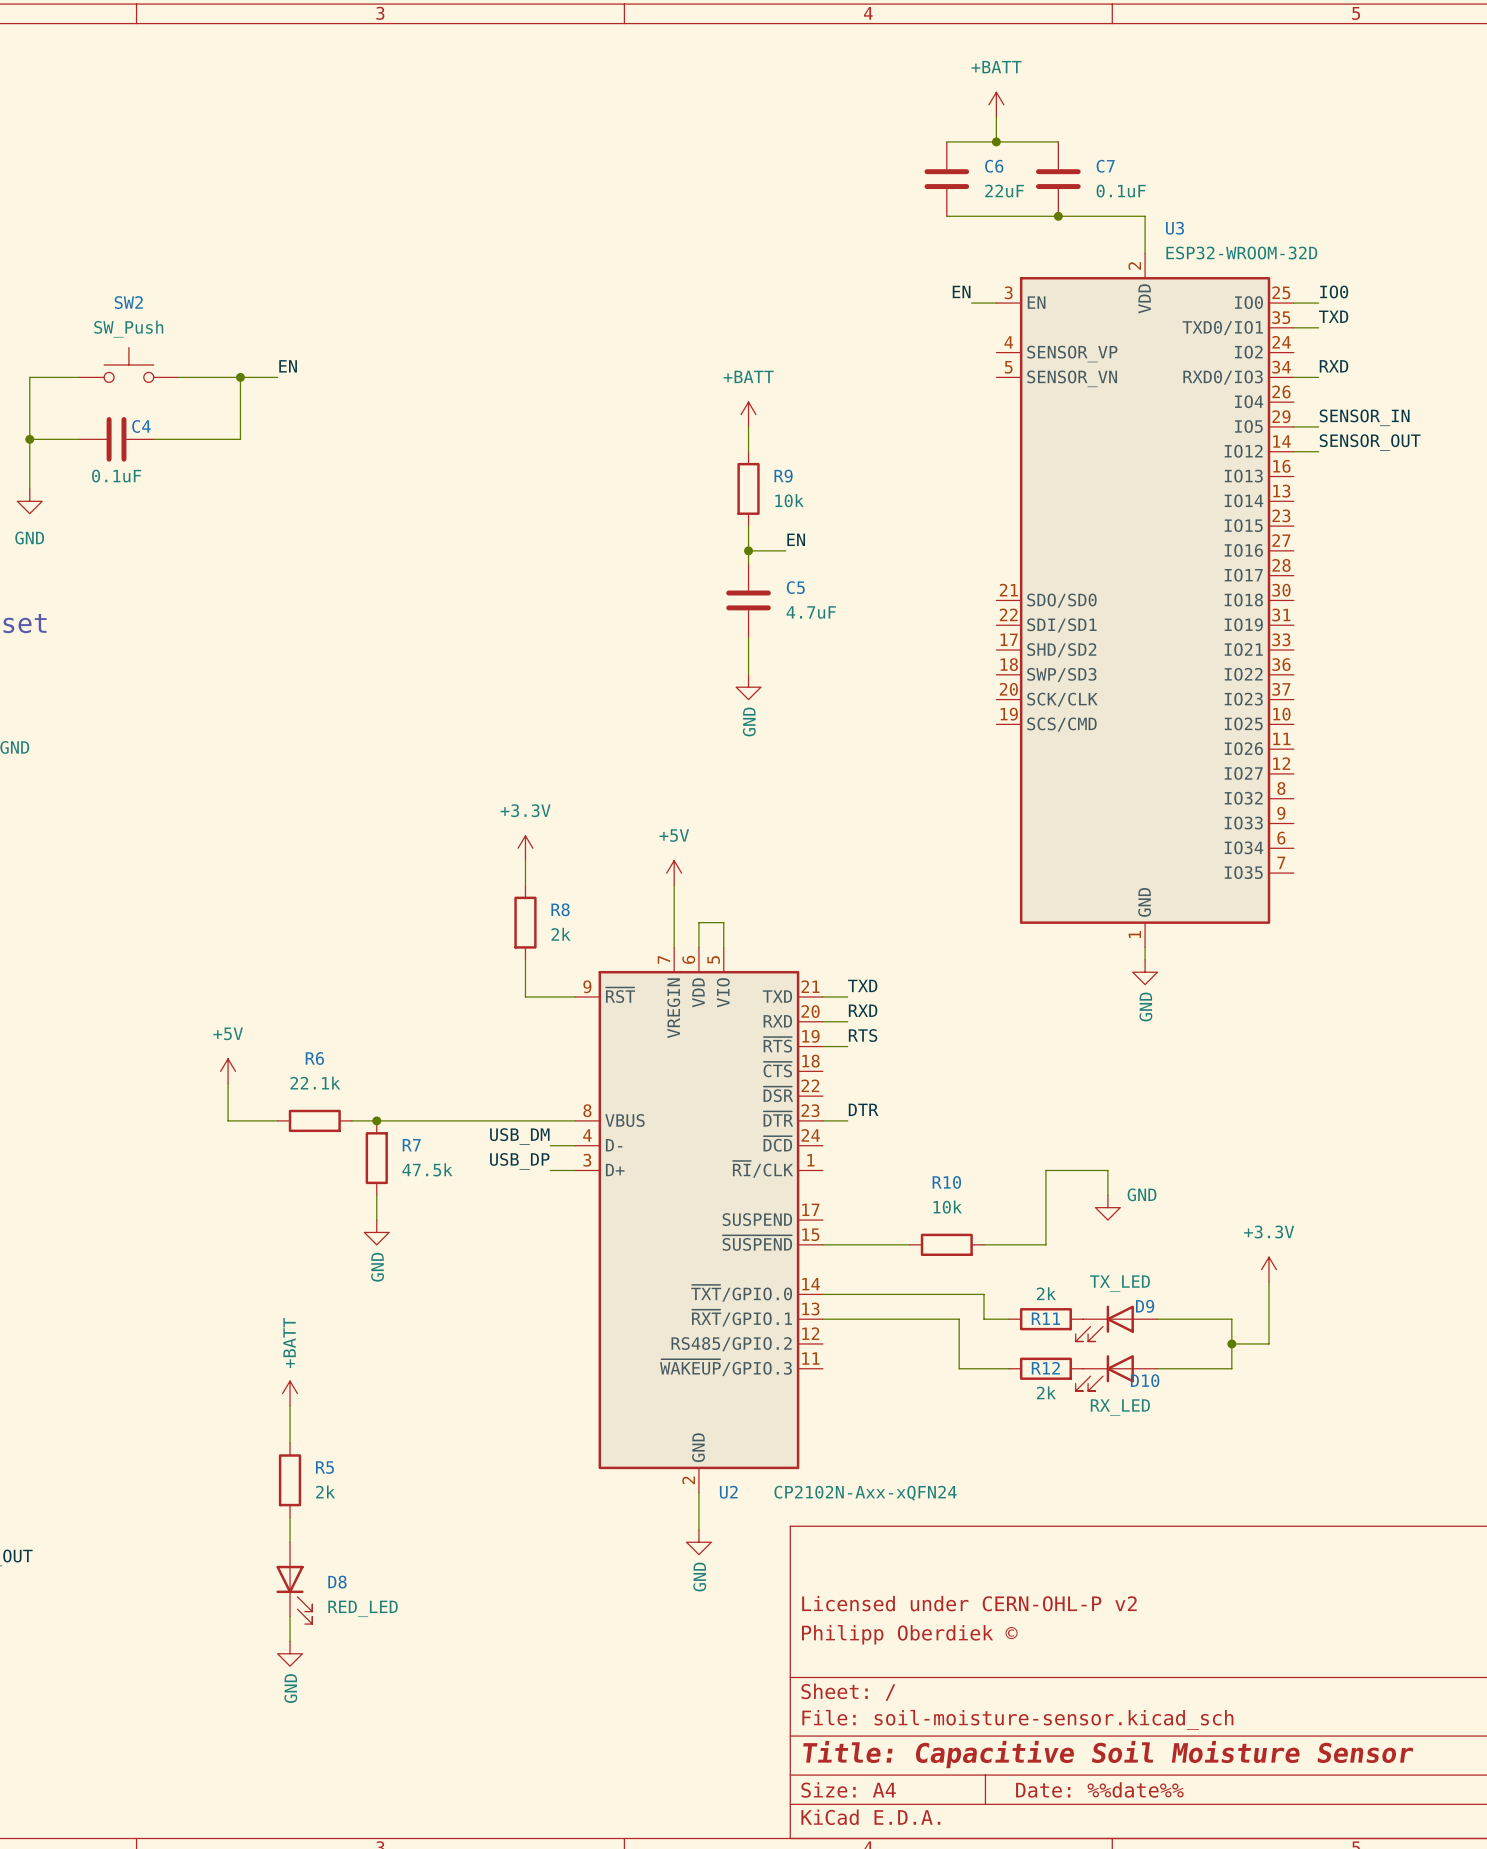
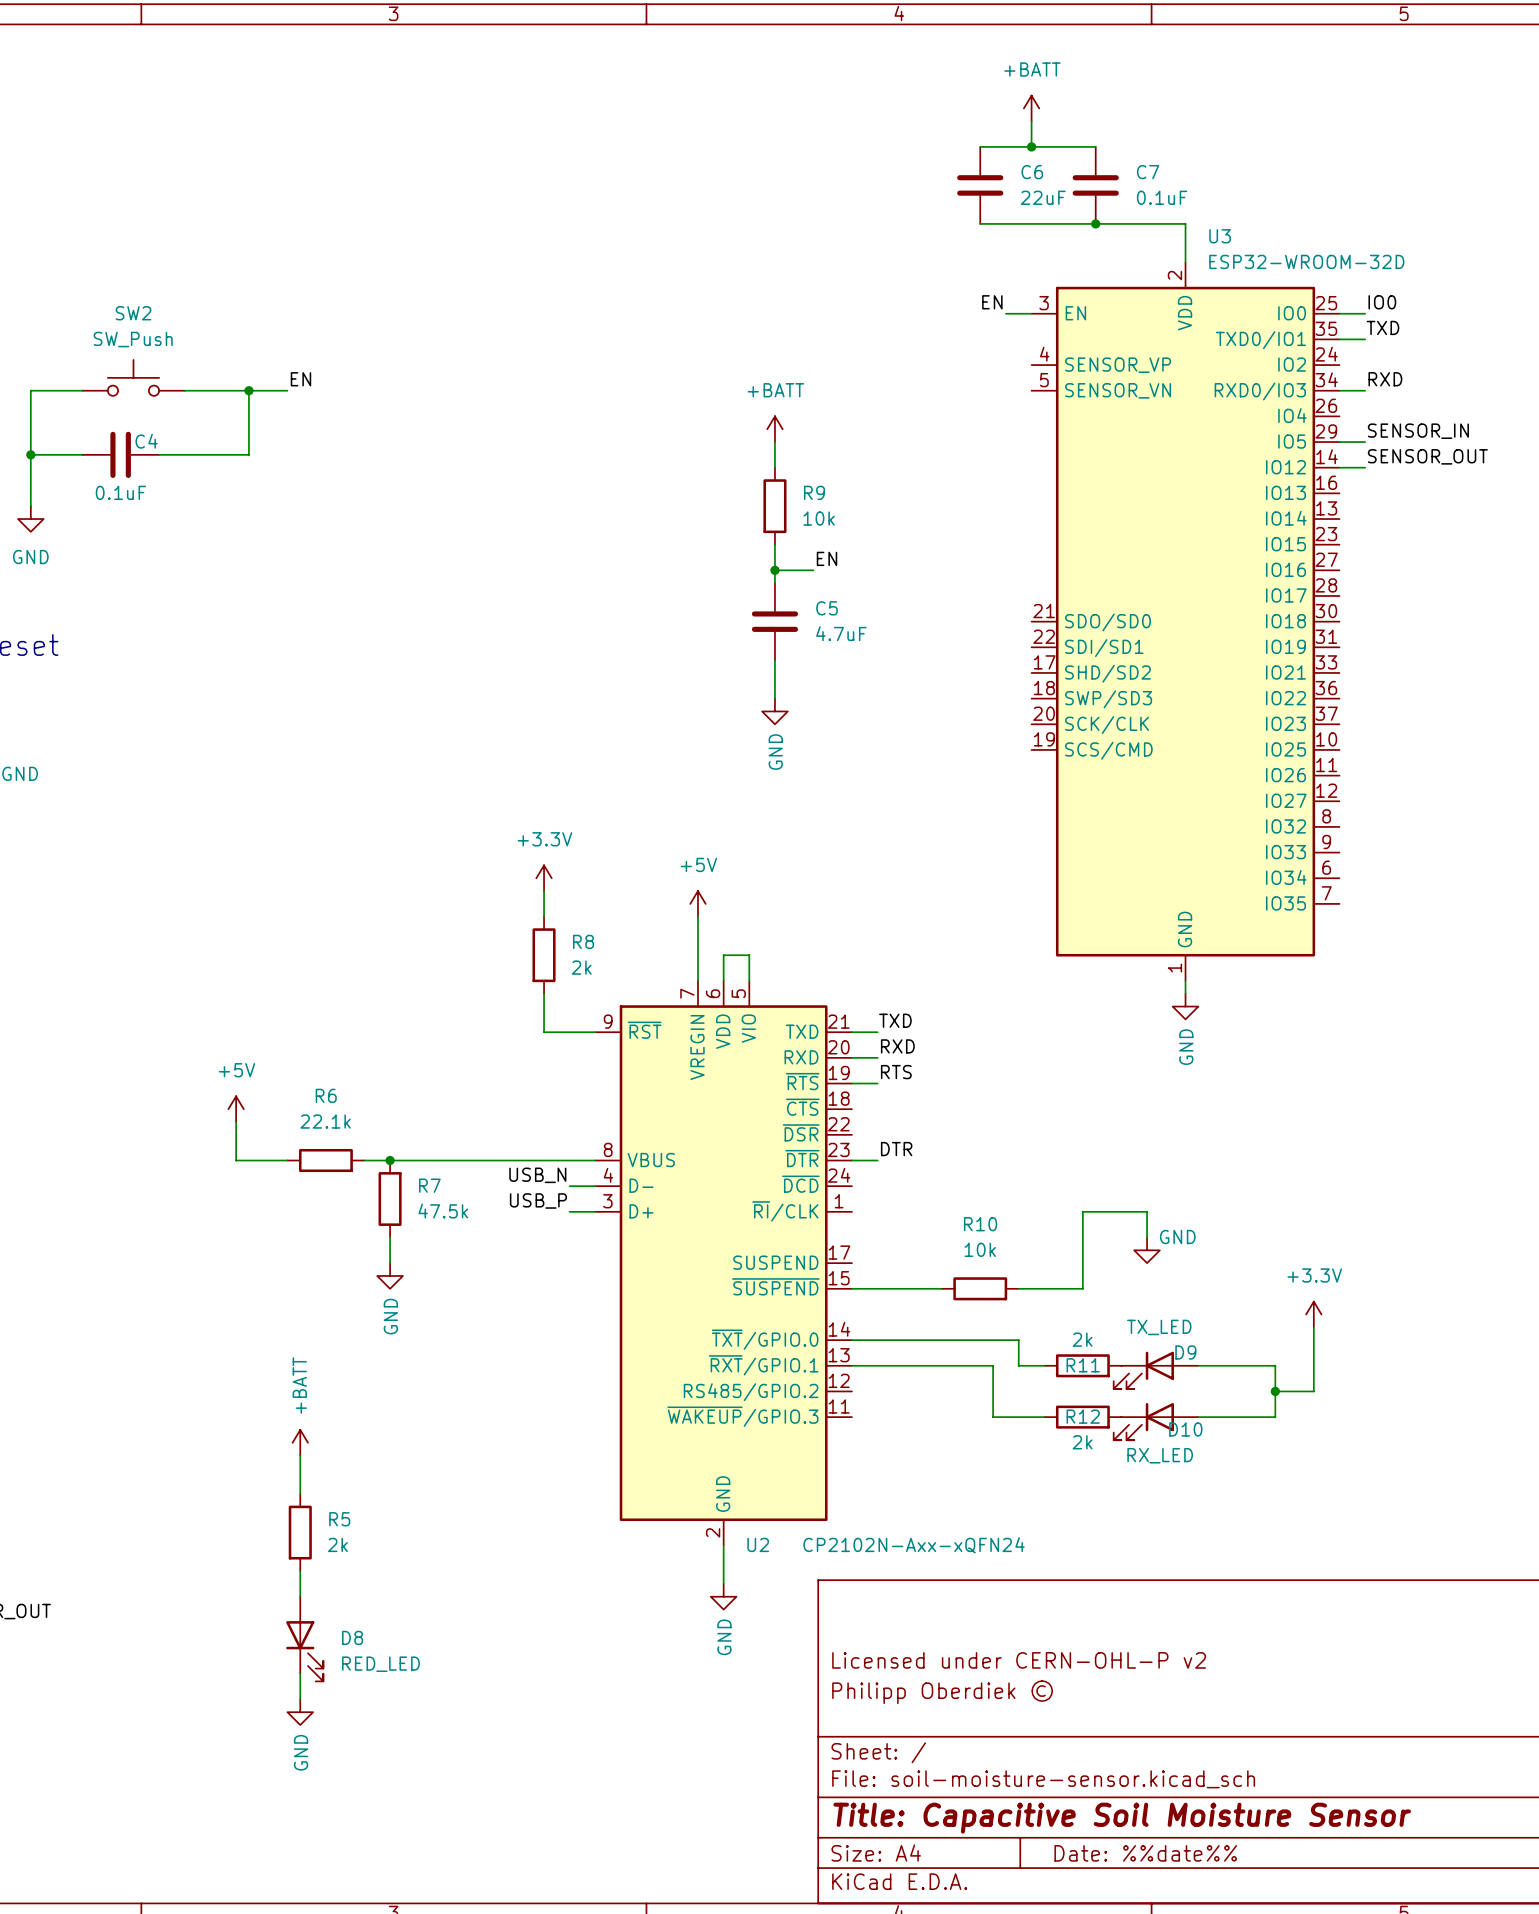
label: USB_DM (519, 1136) -> USB_N (537, 1175)
label: USB_DP (519, 1161) -> USB_P (538, 1200)

